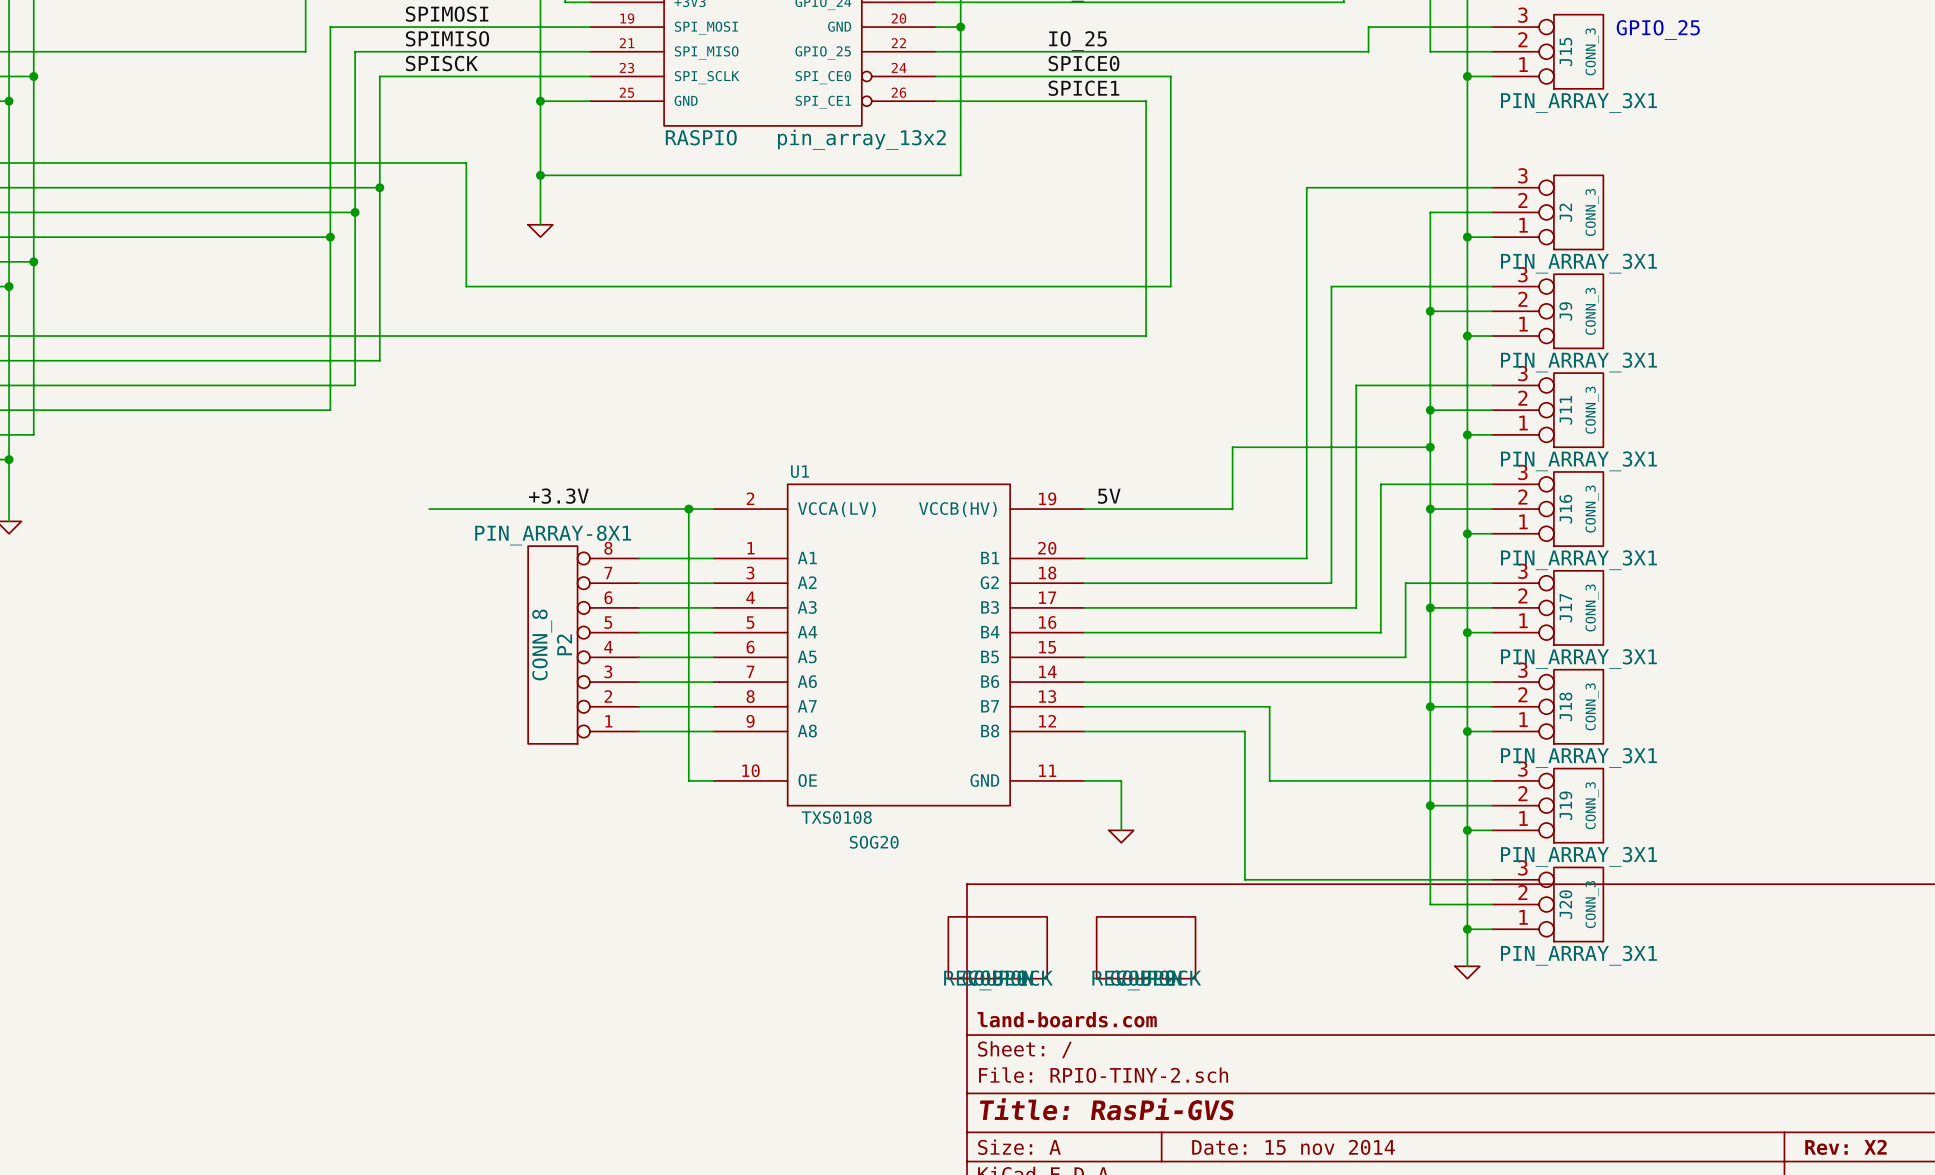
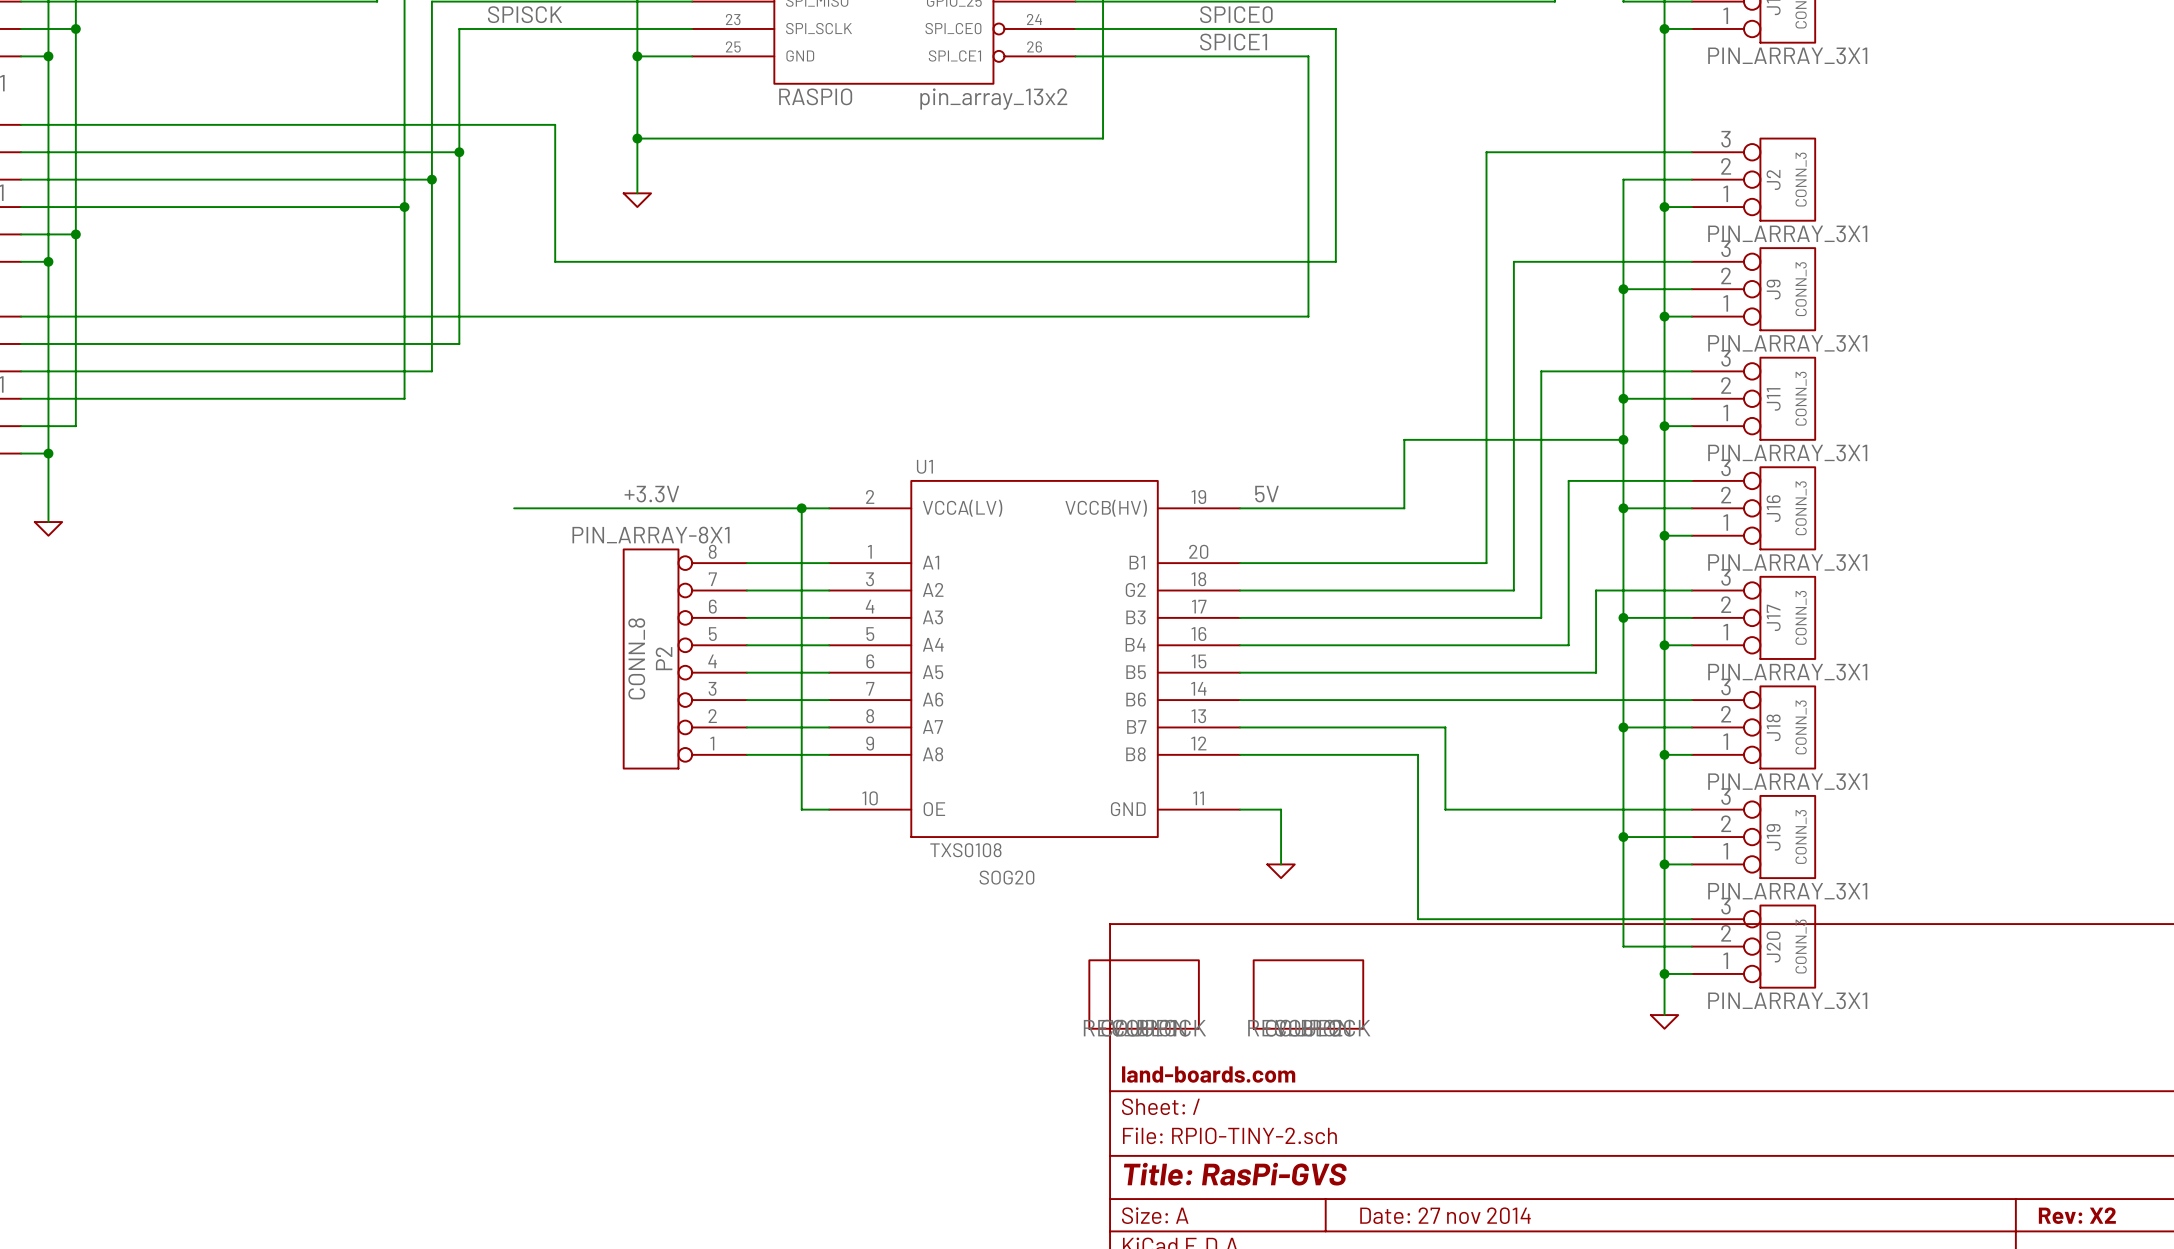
title block: Date: 15 nov 2014 (1293, 1147) -> Date: 27 nov 2014 (1445, 1215)

